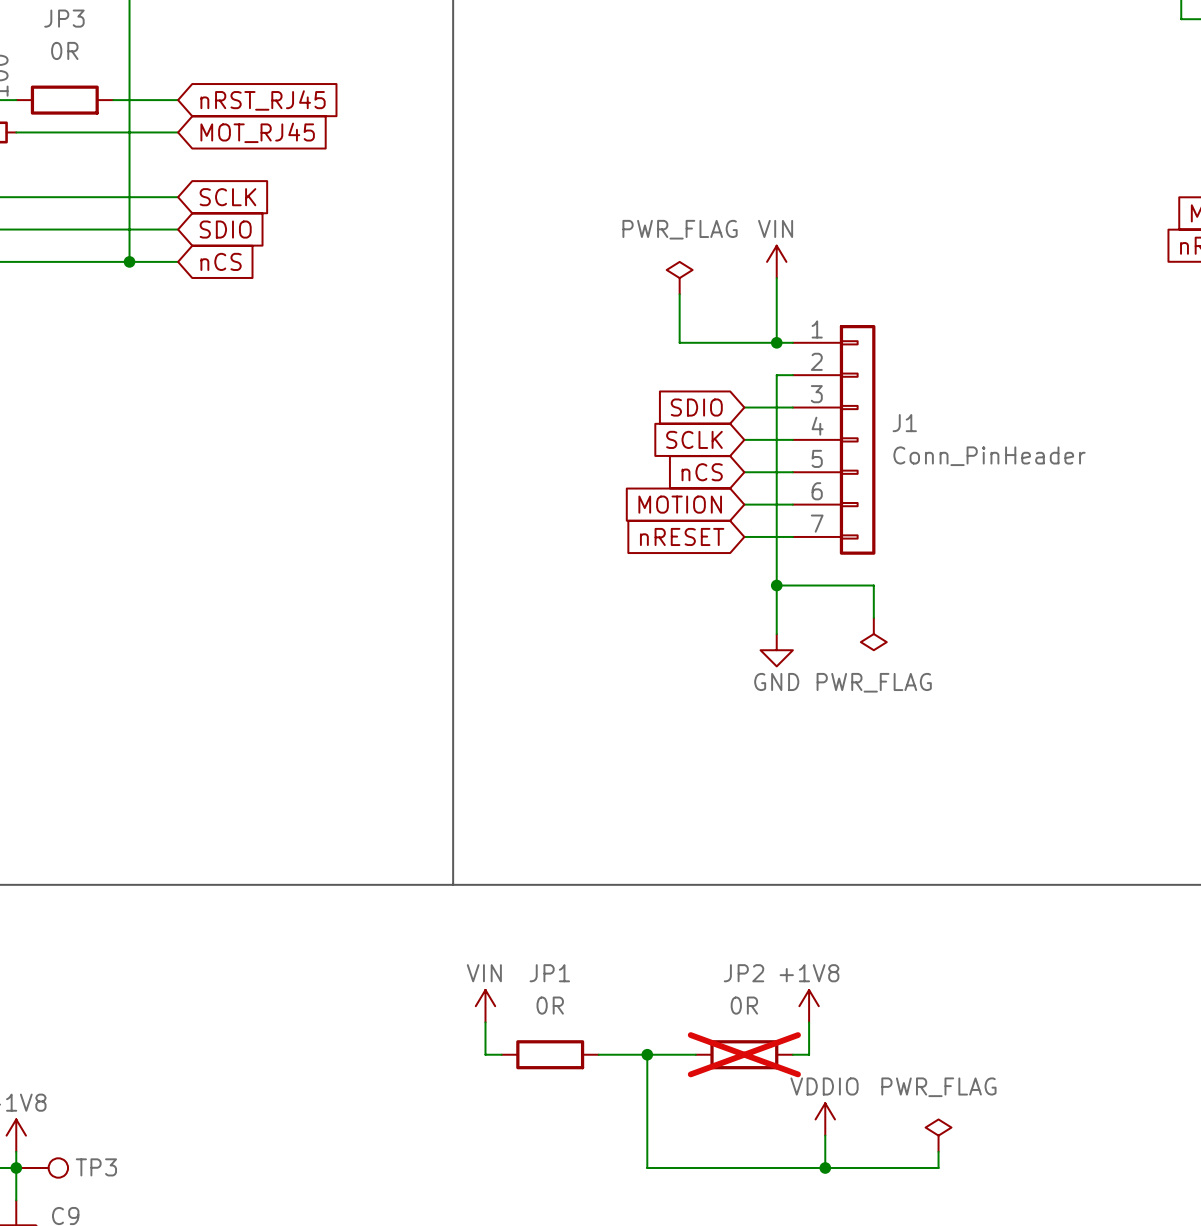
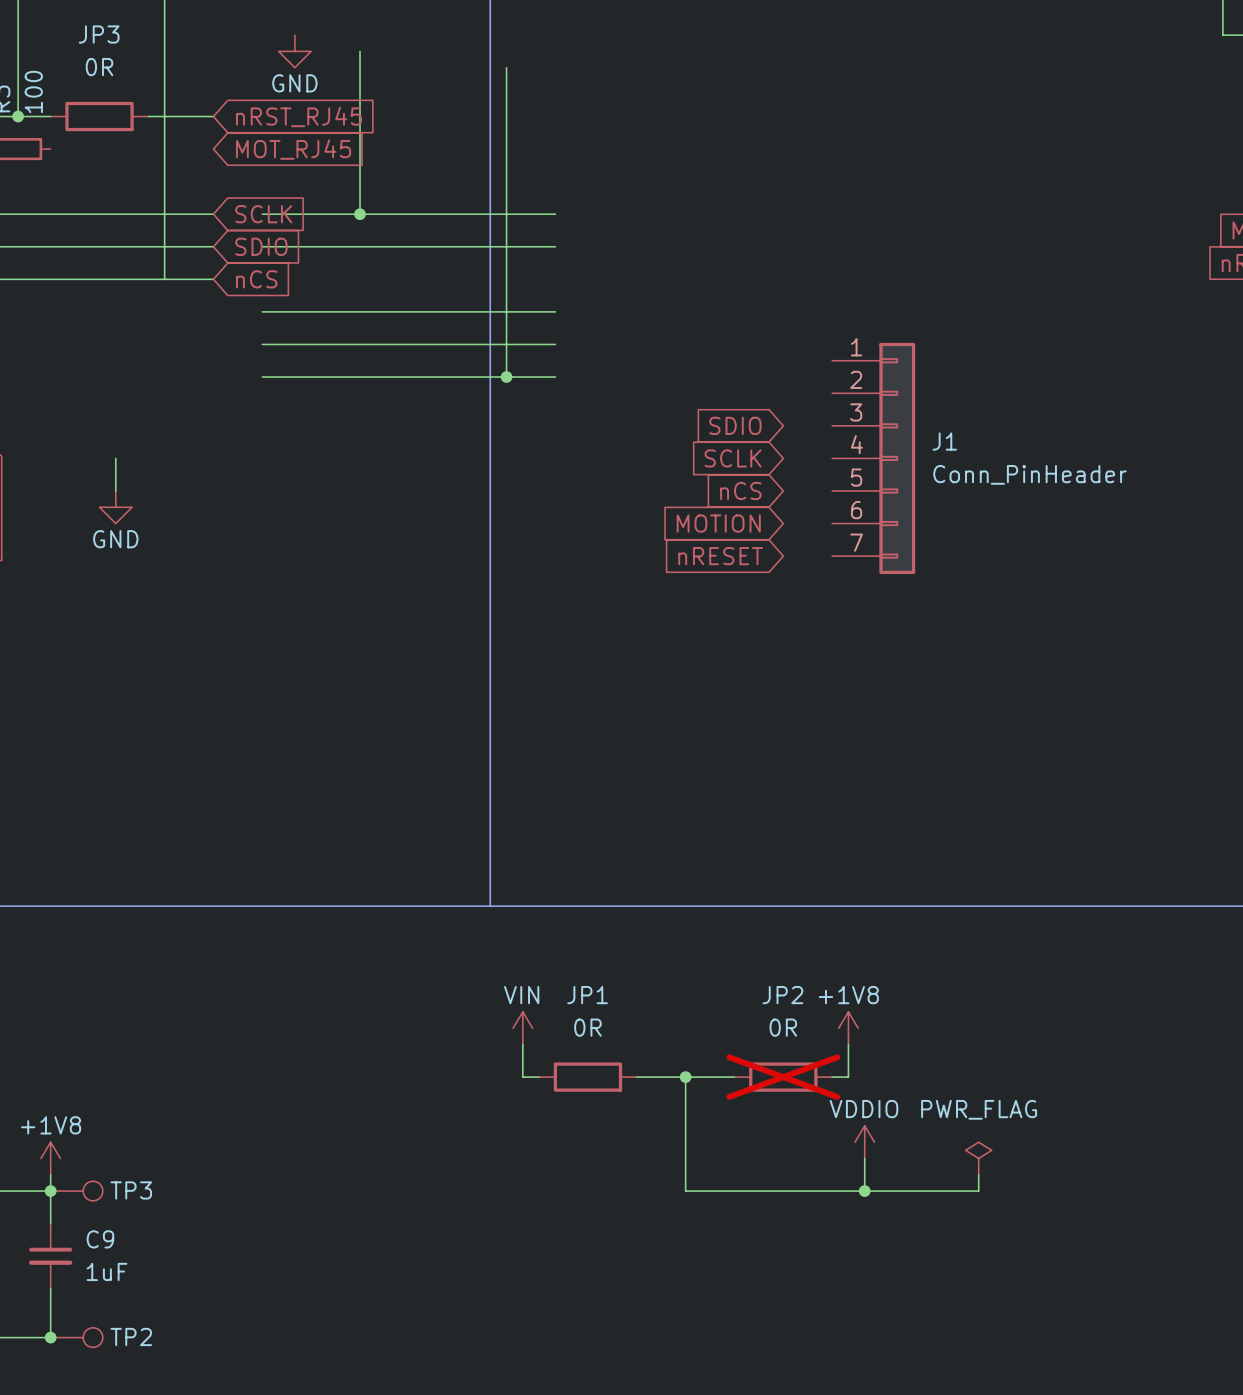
power symbol: none -> GND (294, 51)
wire: none -> (360, 51) (360, 214)
wire: none -> (506, 67) (506, 377)
wire: (16, 132) (178, 132) -> none
wire: none -> (262, 214) (555, 214)
junction: none -> (360, 214)
wire: none -> (262, 246) (555, 246)
junction: (129, 261) -> none
power symbol: VIN (776, 261) -> none
power symbol: PWR_FLAG (679, 278) -> none
wire: (776, 278) (776, 342) -> none
wire: none -> (262, 311) (555, 311)
wire: (679, 294) (679, 342) (792, 342) -> none
wire: none -> (262, 344) (555, 344)
junction: (776, 342) -> none
wire: none -> (262, 377) (555, 377)
junction: none -> (506, 377)
wire: (792, 375) (776, 375) (776, 634) -> none
wire: (744, 407) (792, 407) -> none
wire: none -> (115, 458) (115, 490)
wire: (744, 439) (792, 439) -> none
wire: (744, 472) (792, 472) -> none
power symbol: none -> GND (115, 507)
wire: (744, 504) (792, 504) -> none
wire: (744, 536) (792, 536) -> none
wire: (776, 585) (873, 585) (873, 617) -> none
junction: (776, 585) -> none
power symbol: PWR_FLAG (873, 634) -> none
power symbol: GND (776, 650) -> none

